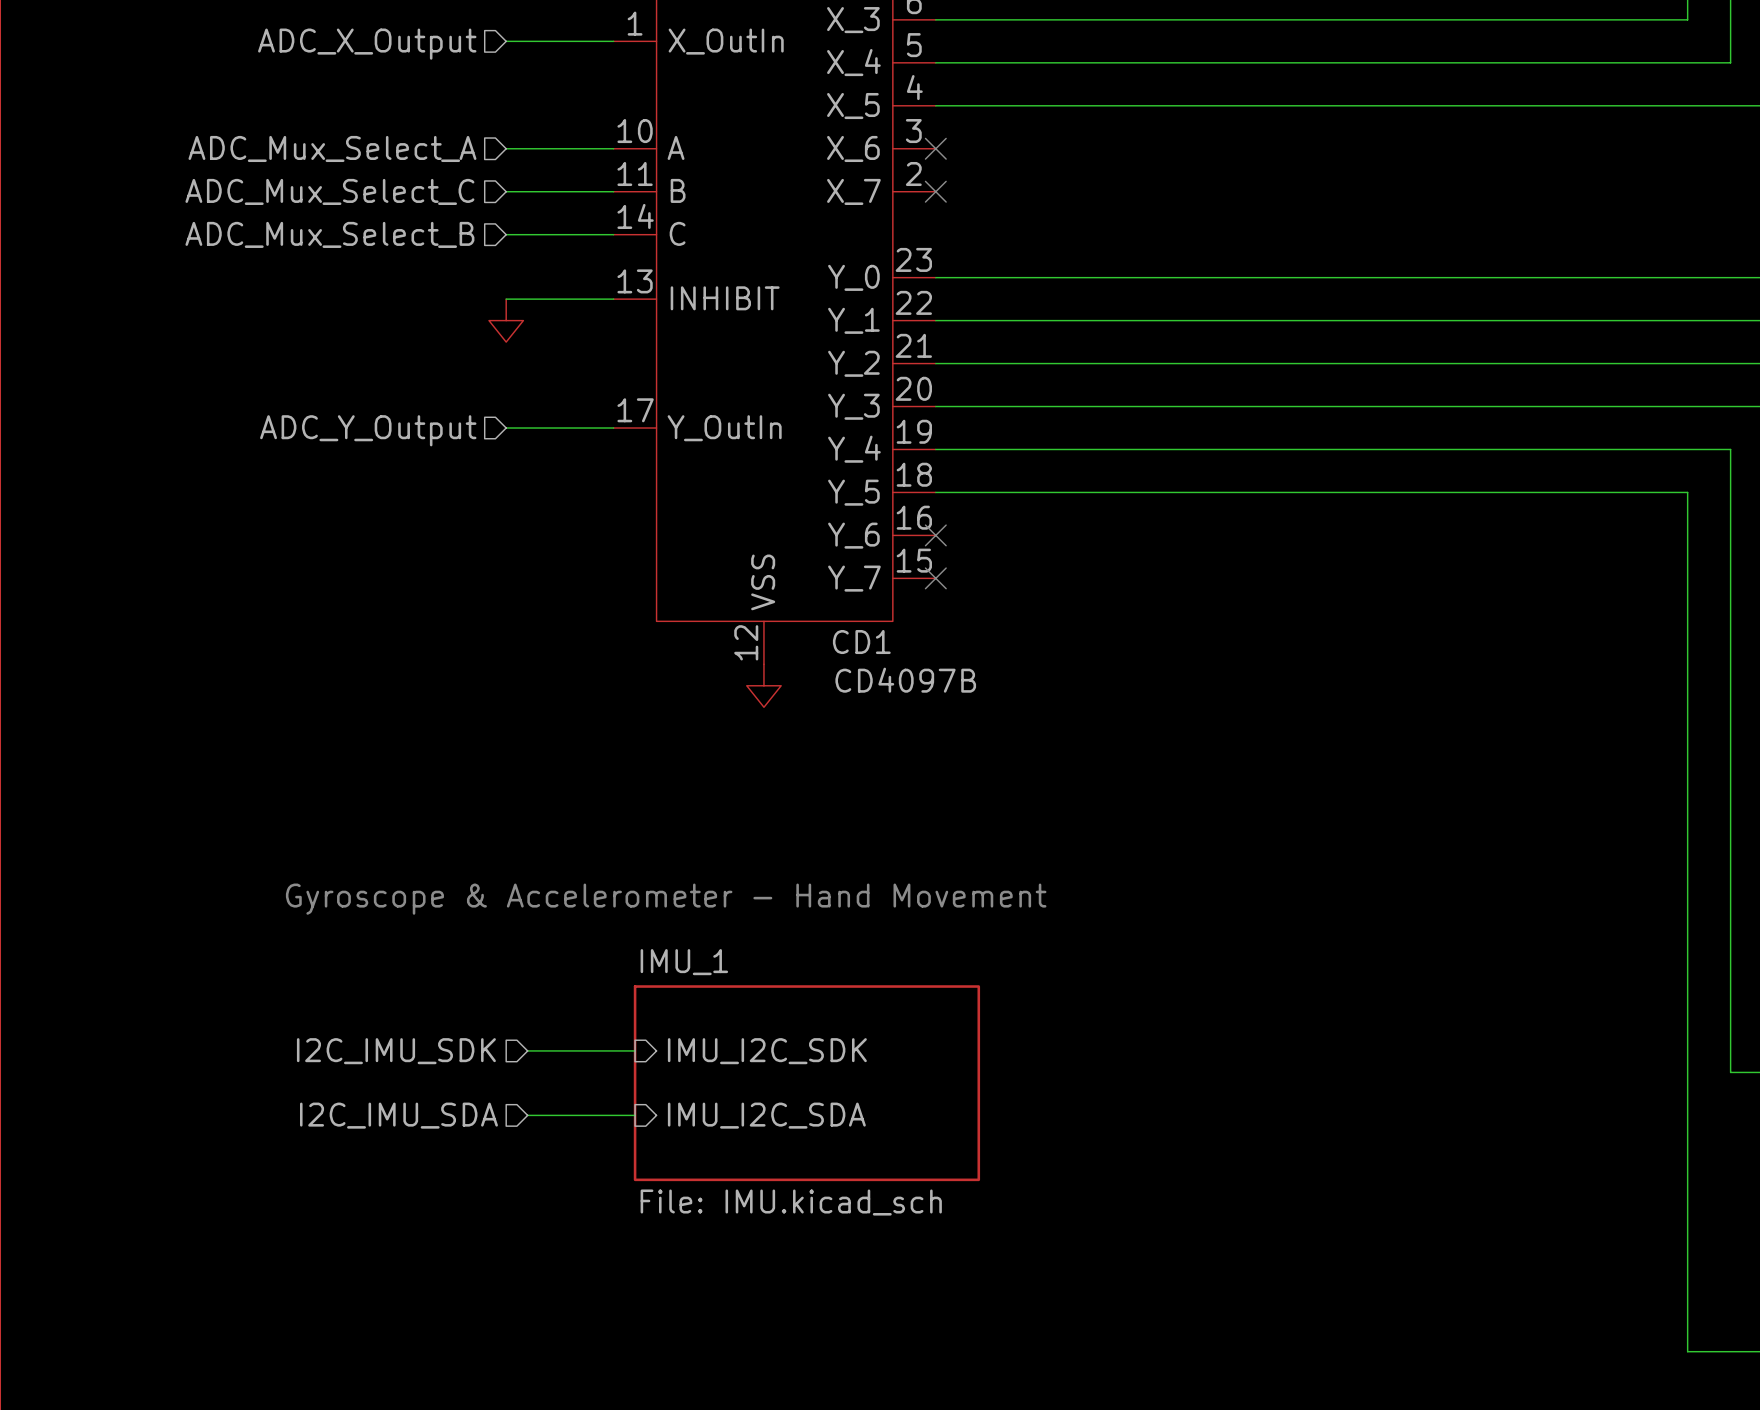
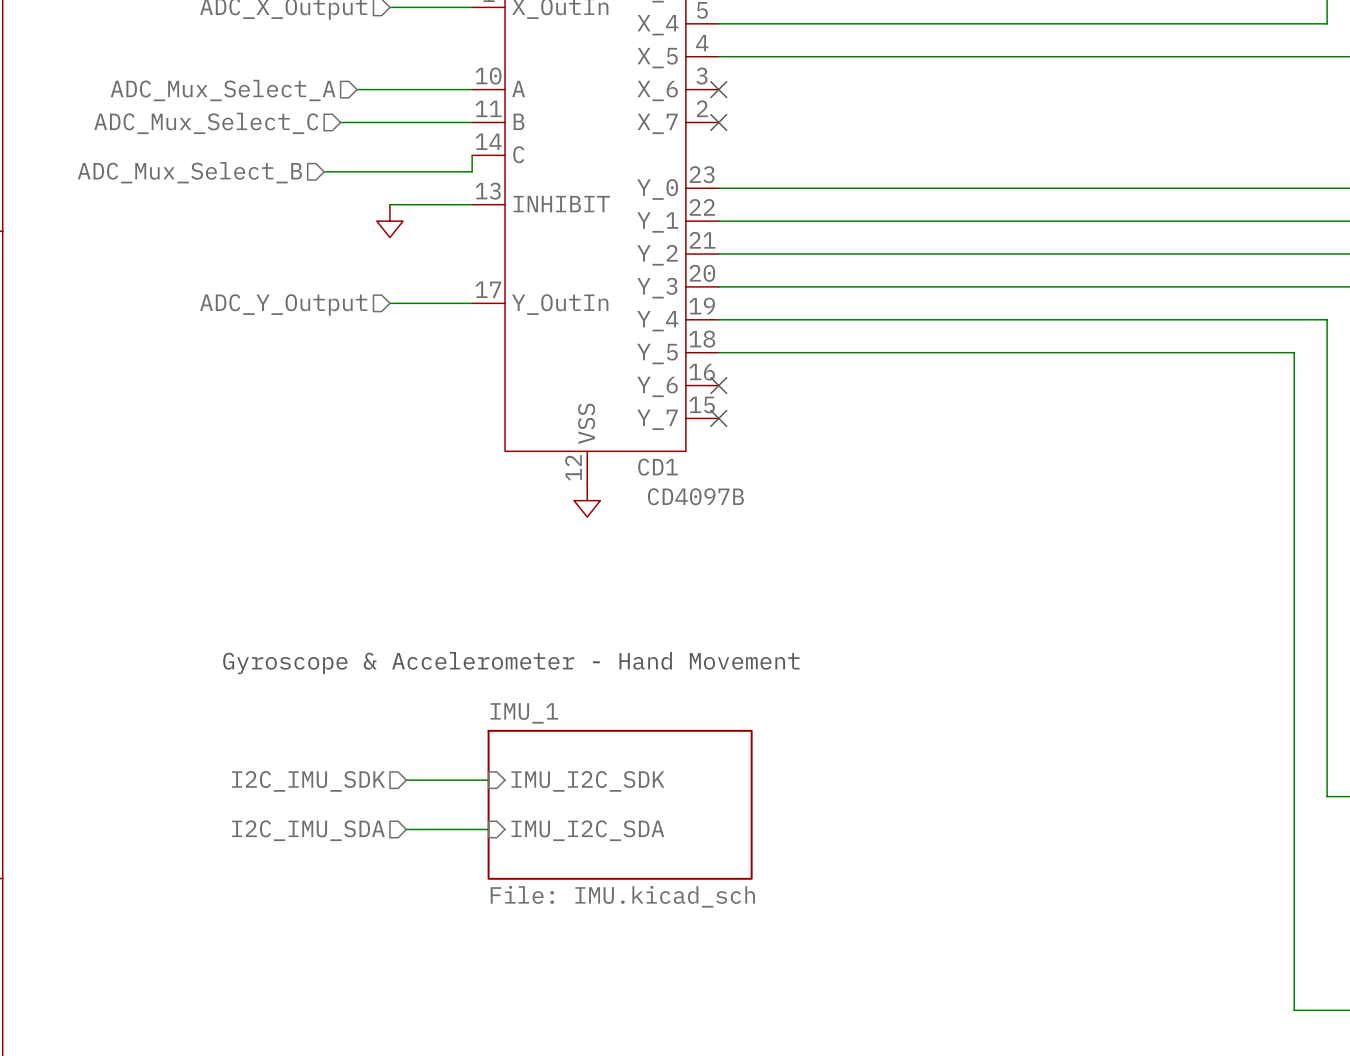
hierarchical label position: ADC_Mux_Select_A (332, 148) -> ADC_Mux_Select_A (223, 90)
wire: none -> (357, 89) (389, 89)
hierarchical label position: ADC_Mux_Select_C (329, 191) -> ADC_Mux_Select_C (206, 123)
wire: none -> (340, 122) (389, 122)
hierarchical label position: ADC_Mux_Select_B (329, 234) -> ADC_Mux_Select_B (189, 172)
wire: (506, 234) (613, 234) -> (324, 171) (472, 171) (472, 155)

